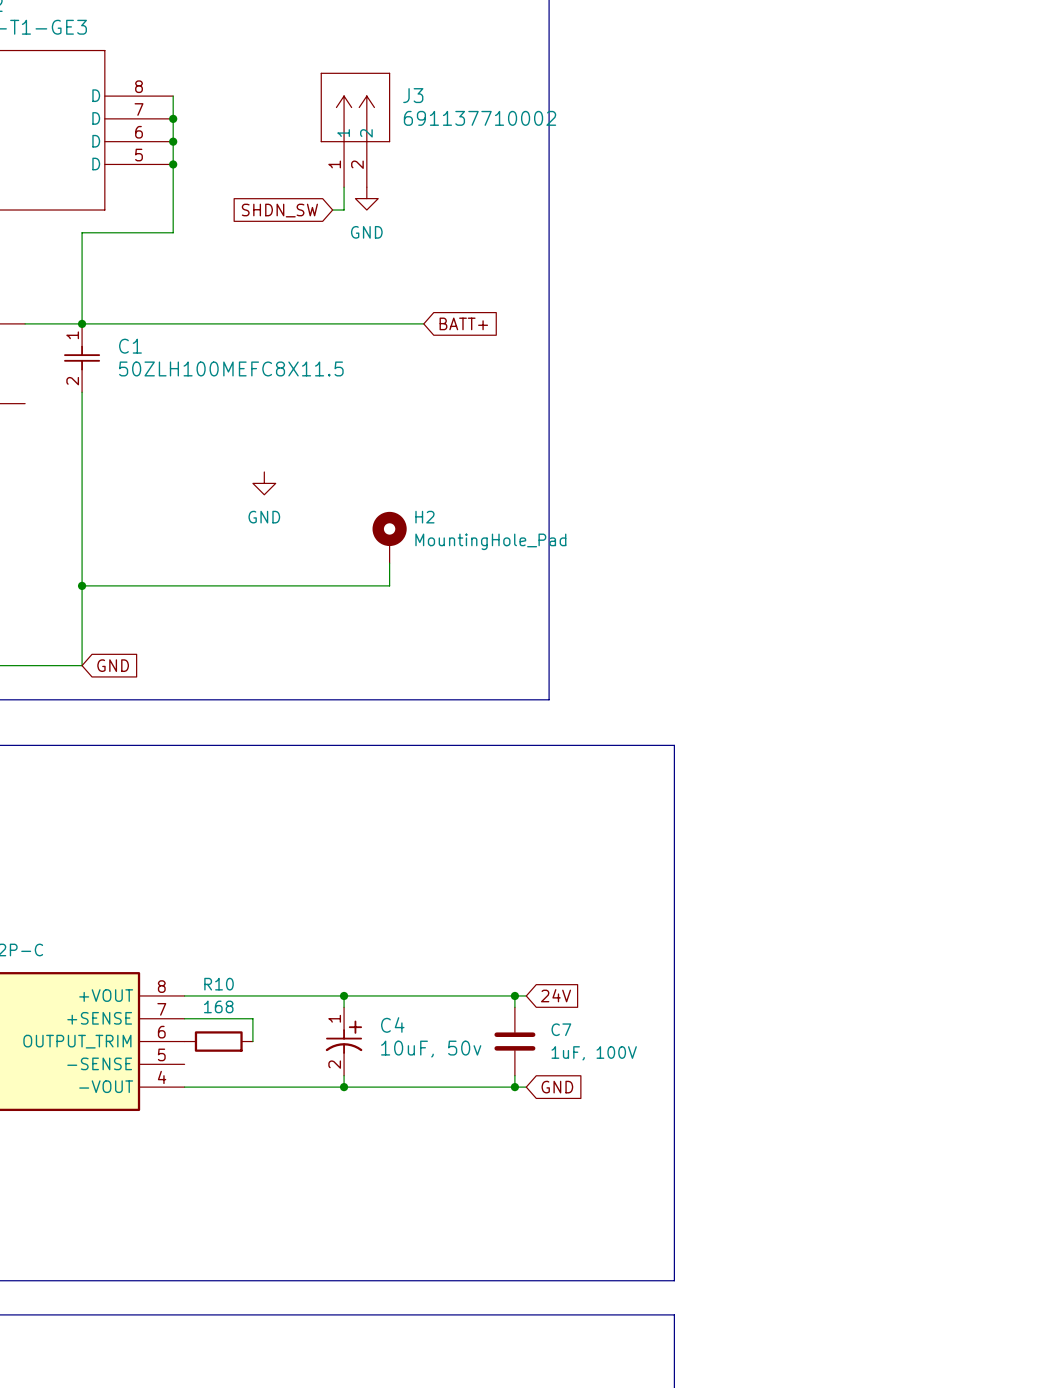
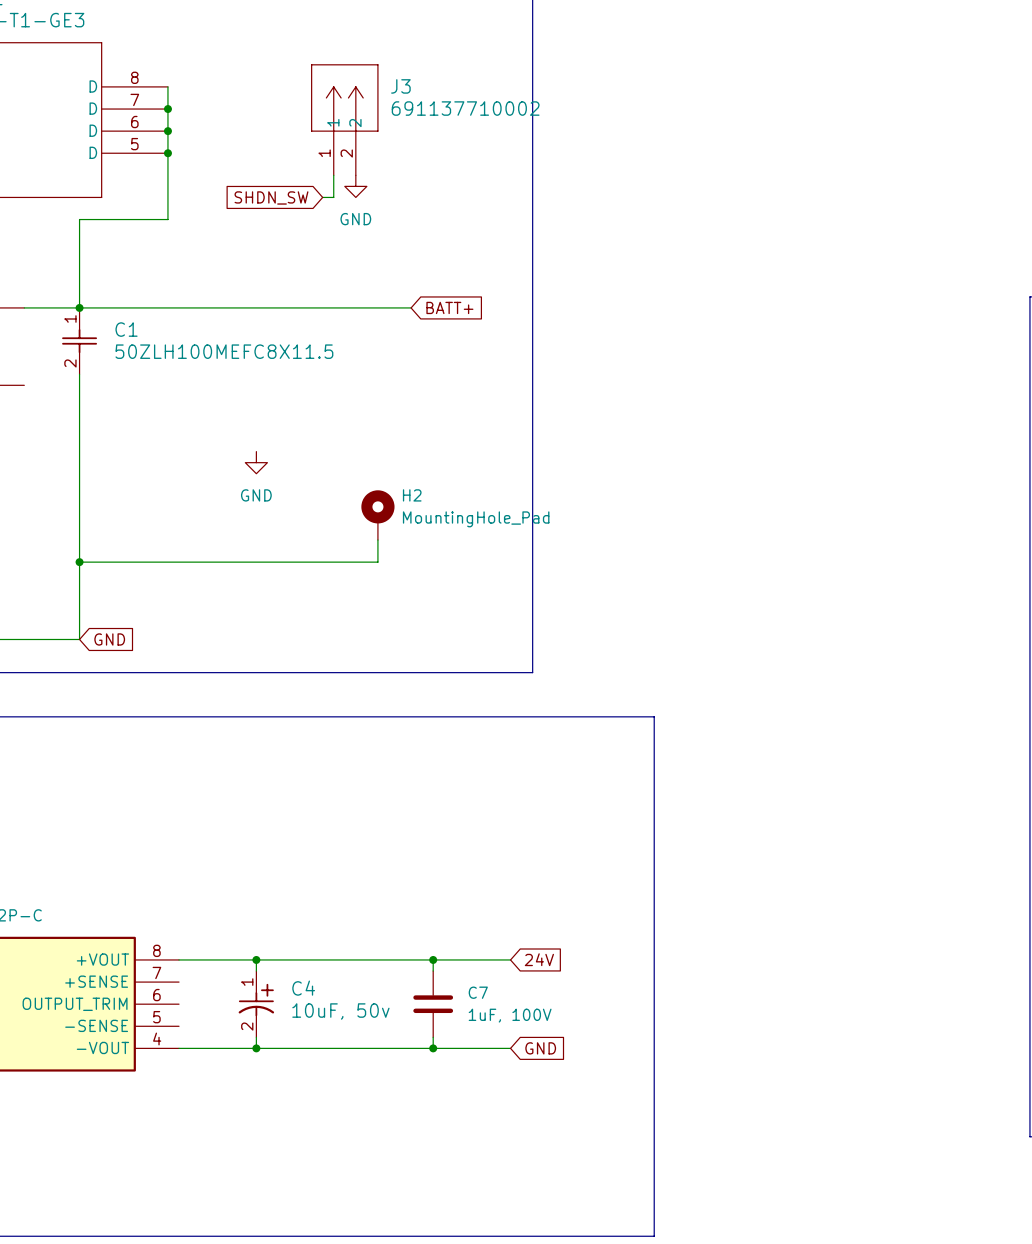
junction: none -> (256, 959)
wire: (344, 995) (344, 1007) -> (256, 959) (256, 971)
junction: (344, 995) -> none
junction: none -> (433, 959)
wire: (514, 995) (514, 1007) -> (433, 959) (433, 971)
junction: (514, 995) -> none
wire: (184, 1018) (252, 1018) (252, 1041) -> none
R10: 168 (218, 1041) -> none
C4 position: (344, 1041) -> (256, 1004)
C7 position: (514, 1041) -> (433, 1004)
wire: (344, 1075) (344, 1087) -> (256, 1037) (256, 1048)
wire: (514, 1075) (514, 1087) -> (433, 1037) (433, 1048)
junction: none -> (256, 1048)
junction: (344, 1087) -> none
junction: none -> (433, 1048)
junction: (514, 1087) -> none

